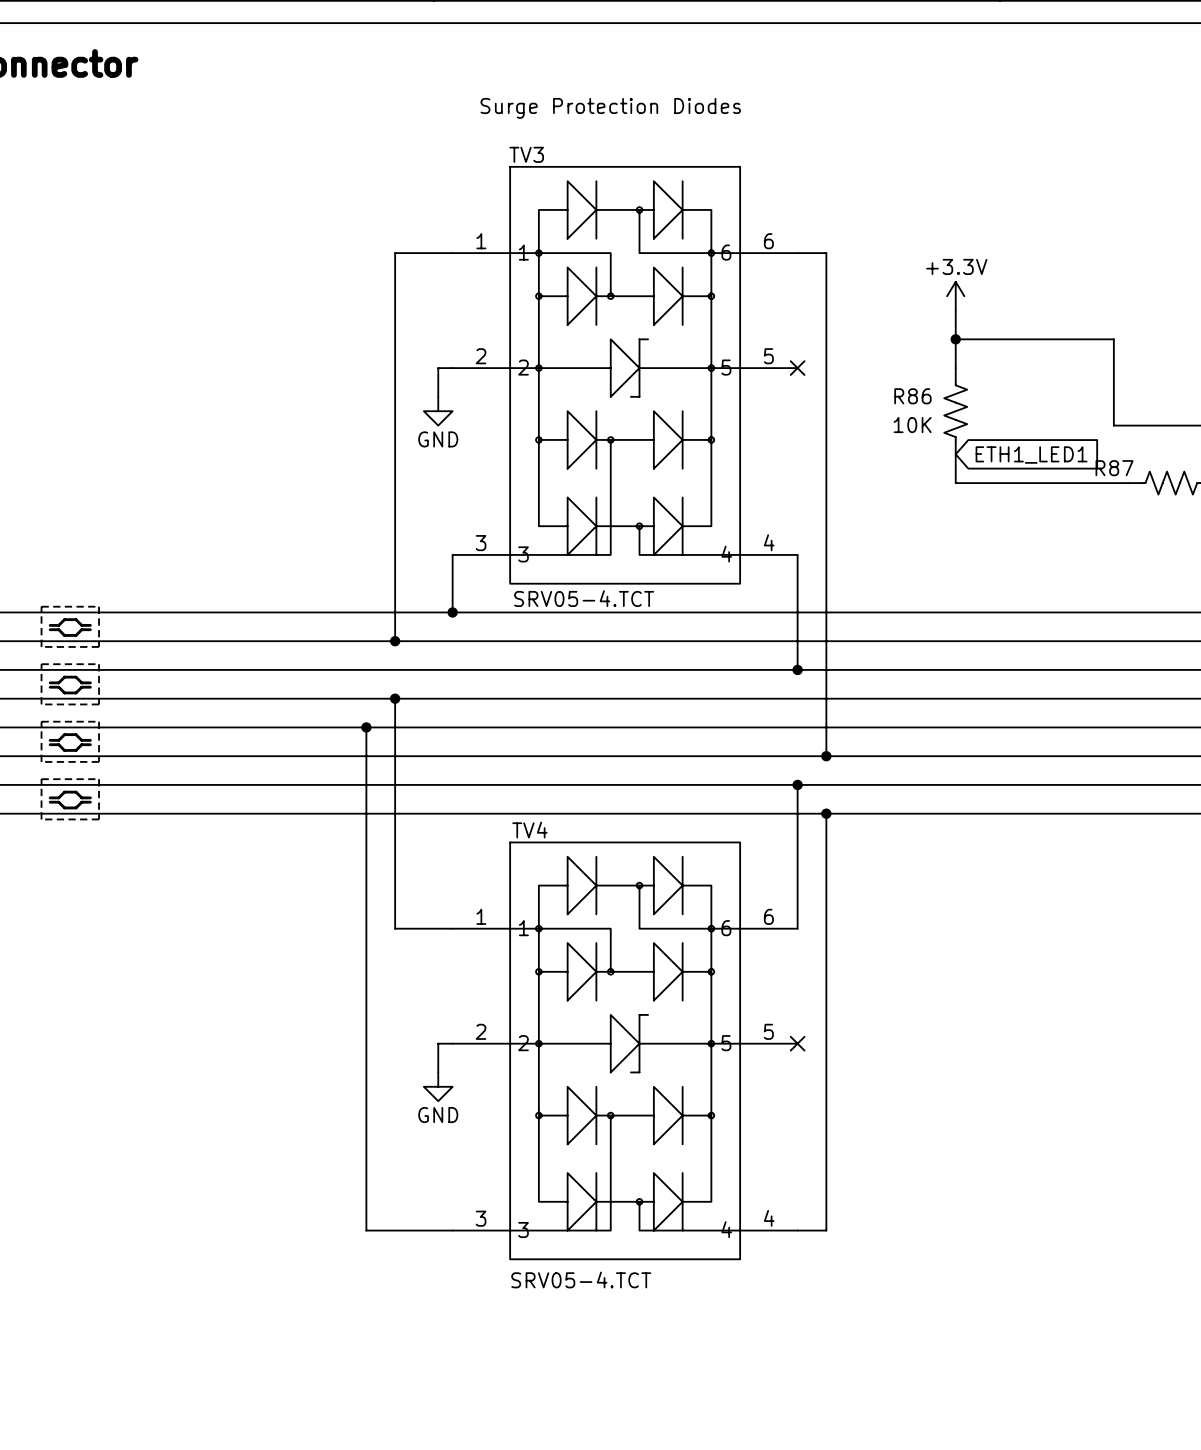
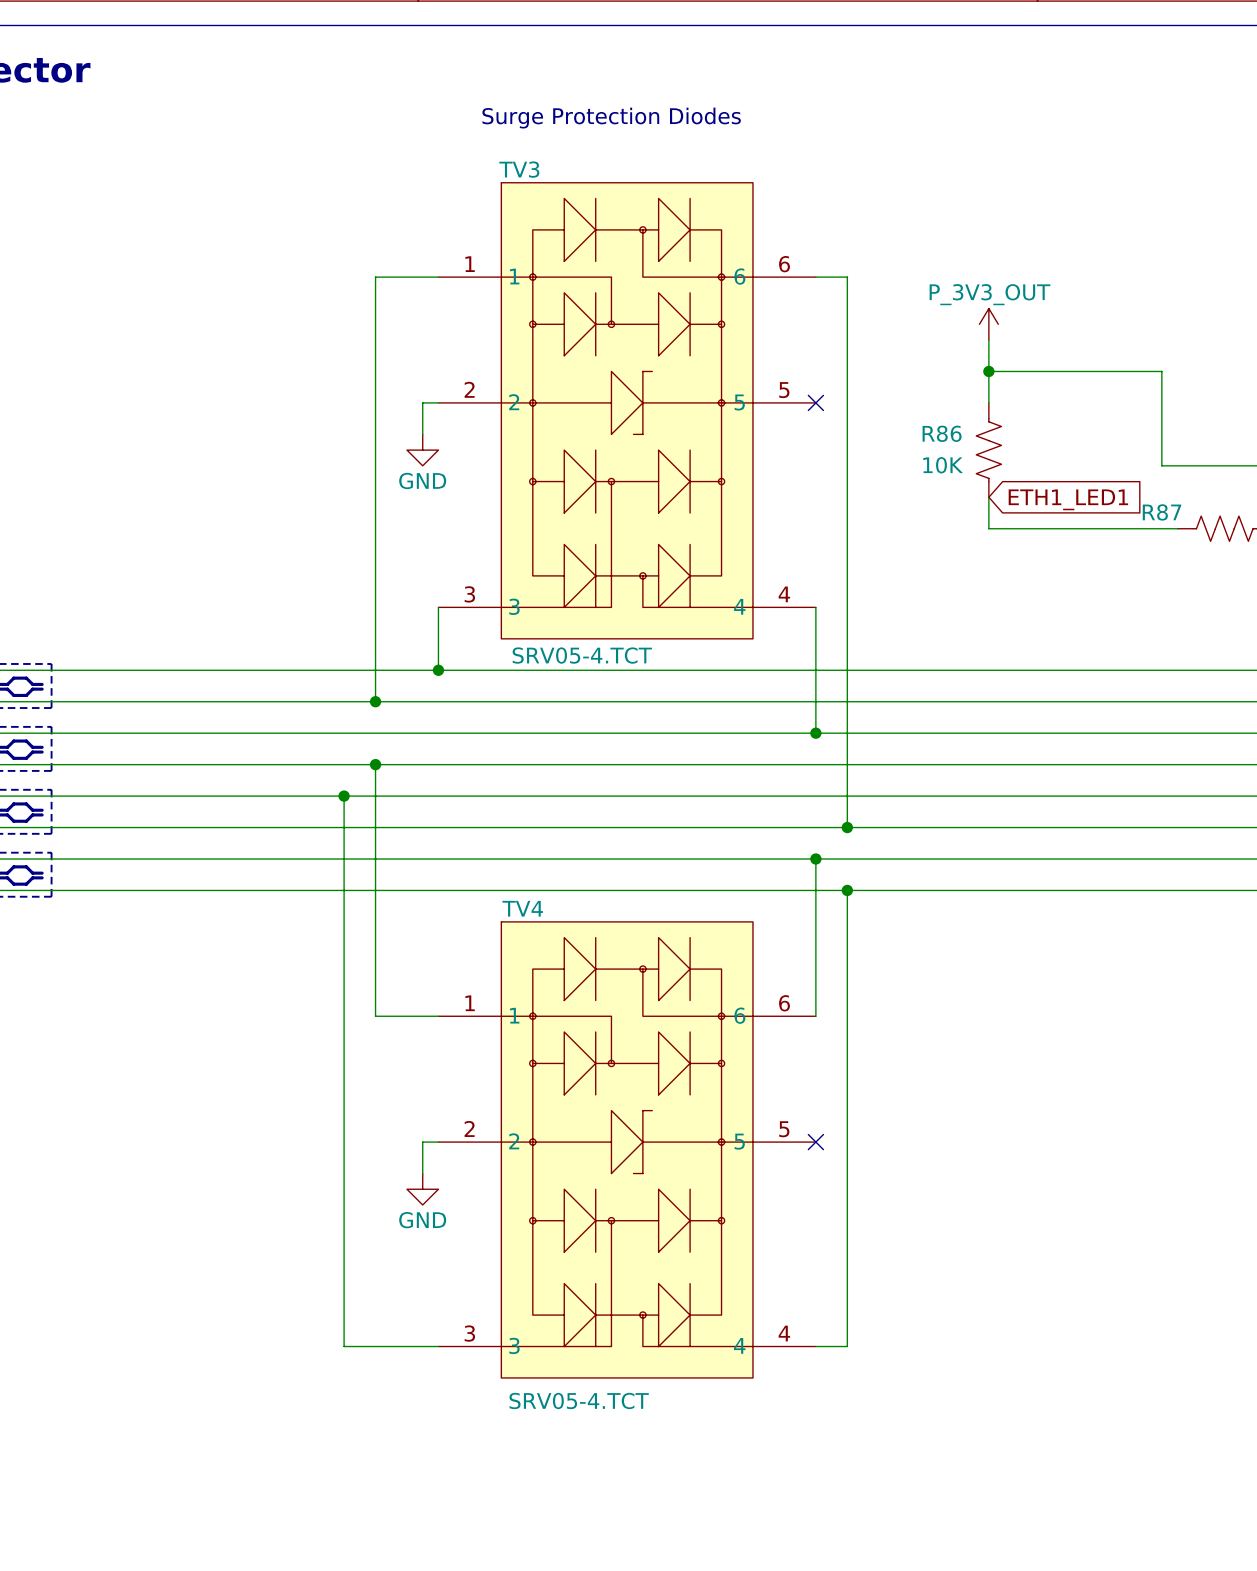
power symbol: +3.3V (955, 296) -> P_3V3_OUT (988, 324)

